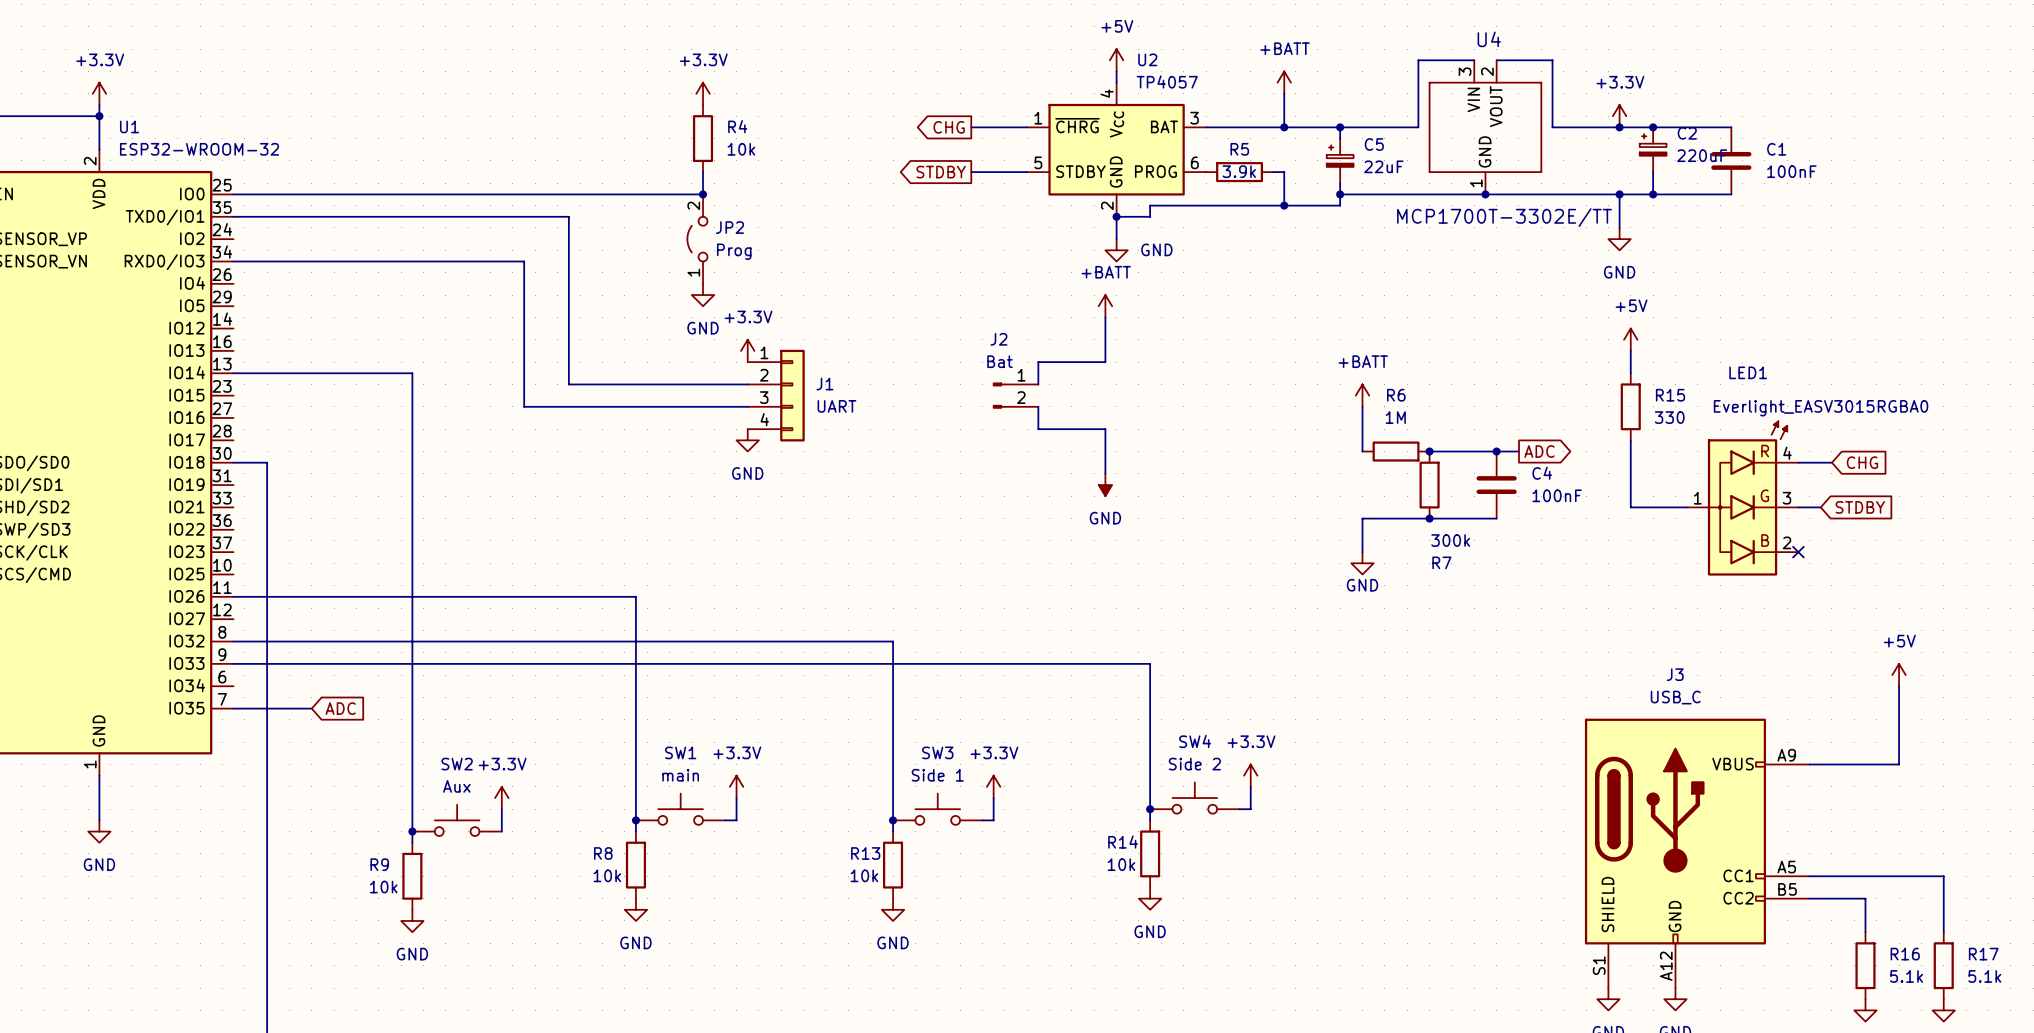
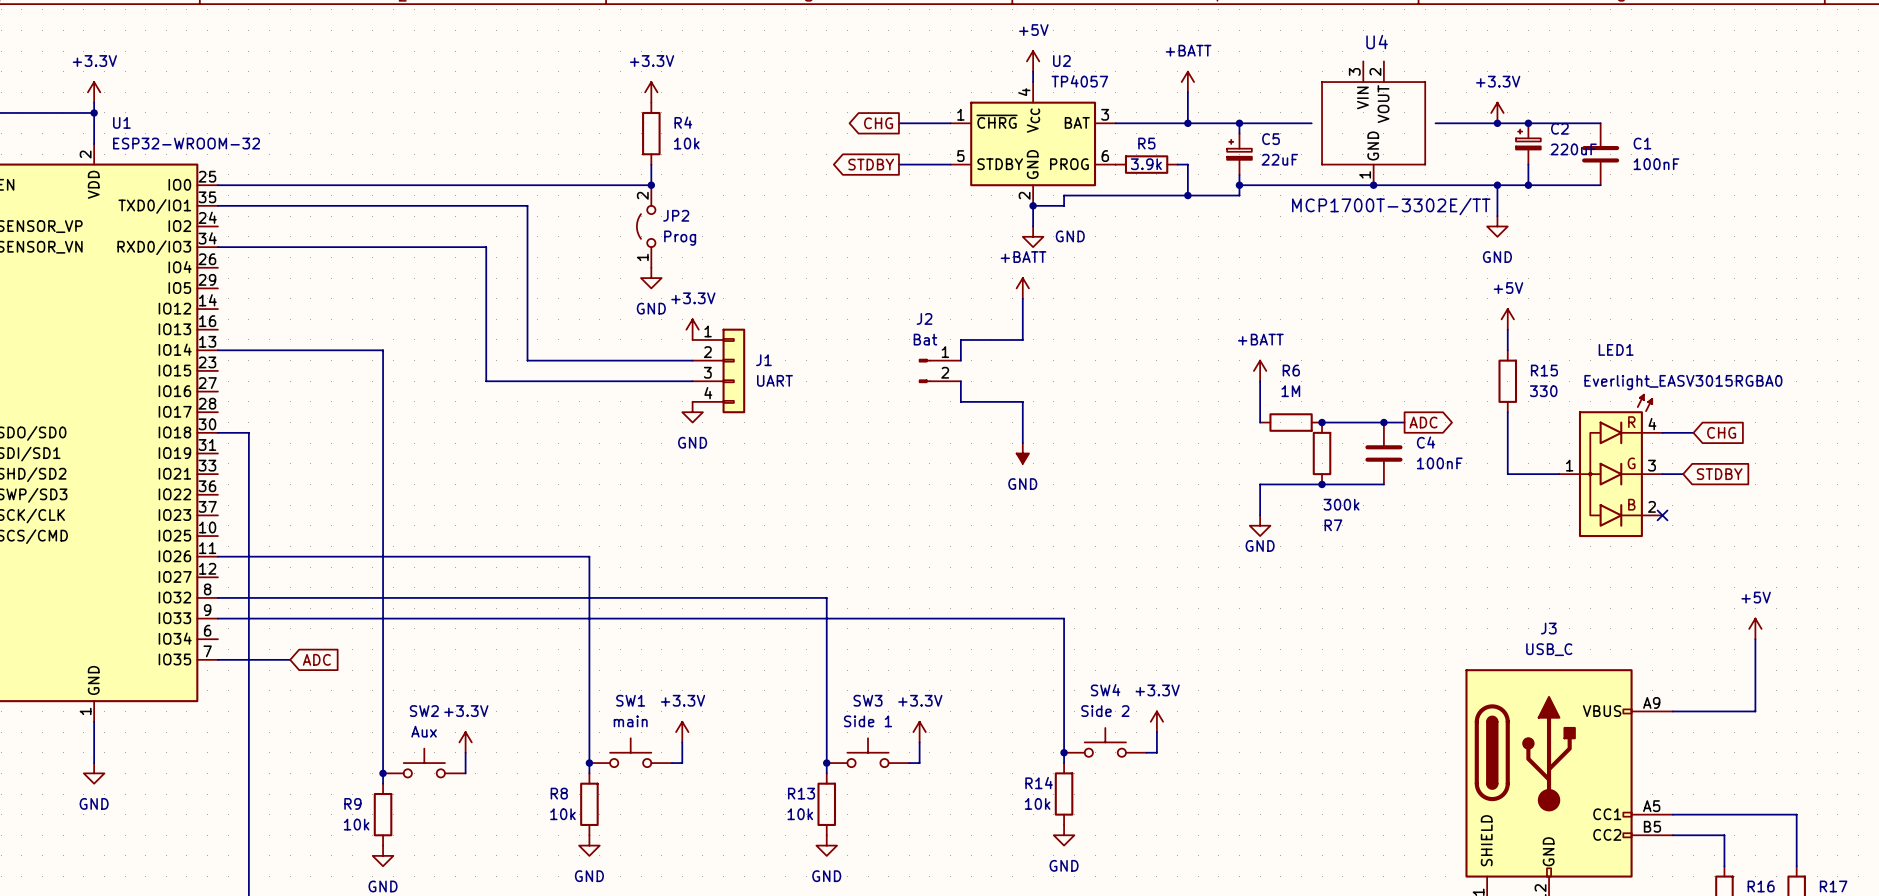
wire: (1474, 60) (1418, 60) (1418, 127) -> none
wire: (1496, 60) (1552, 60) (1552, 127) -> none

